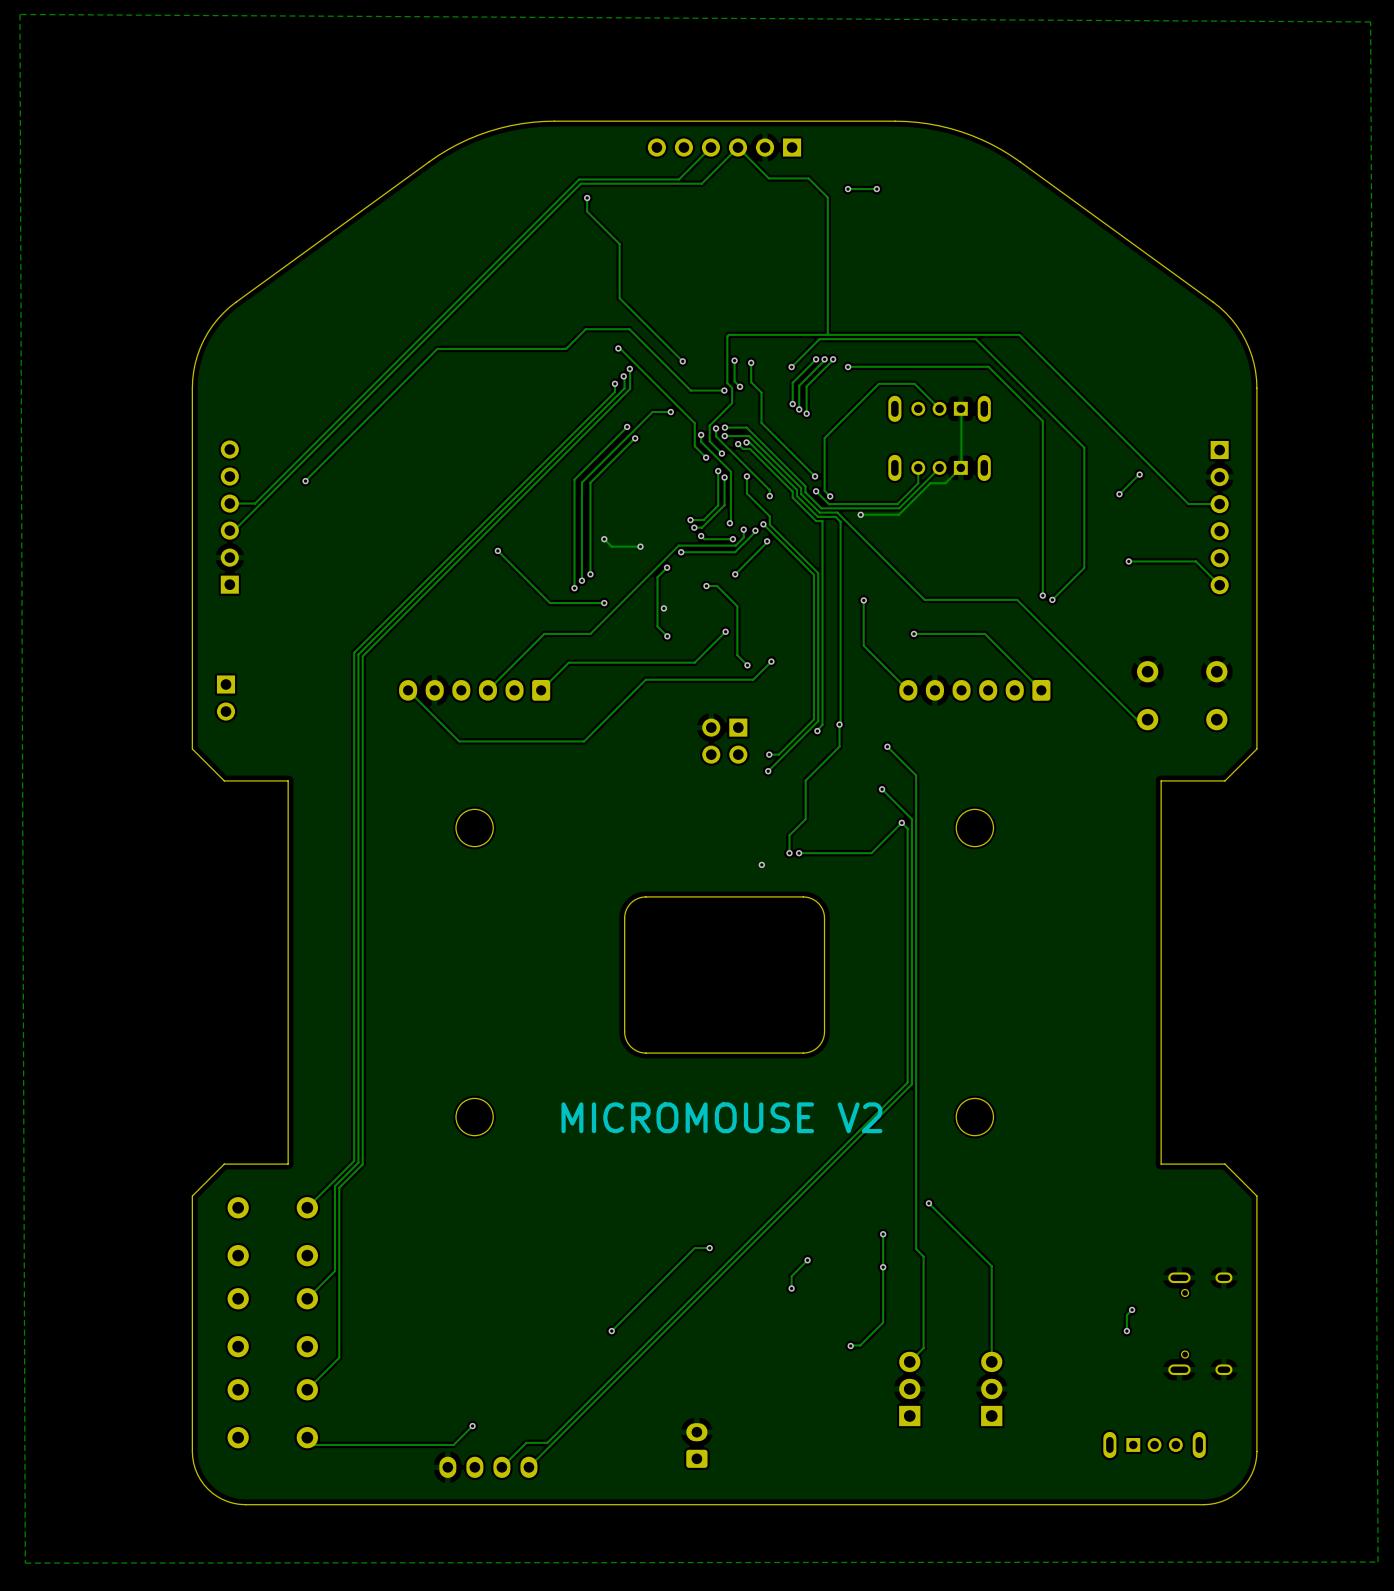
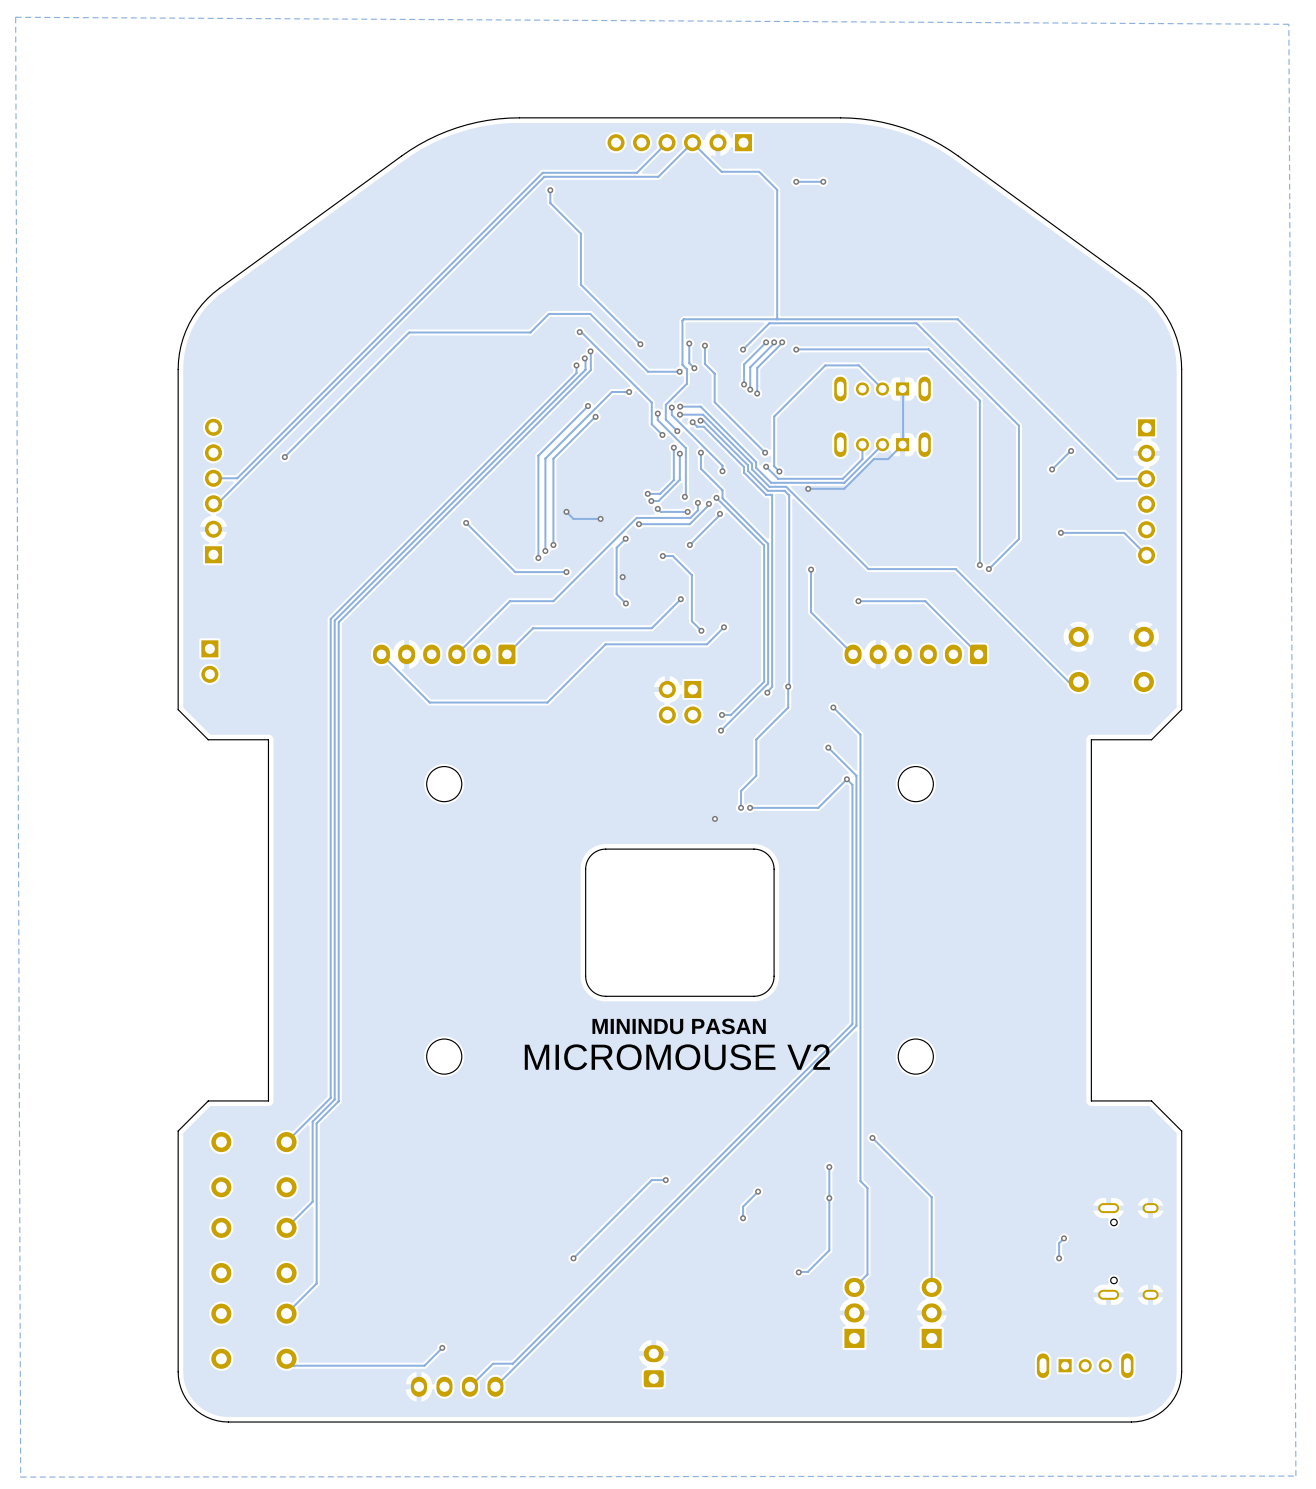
text: none -> MININDU PASAN (679, 1026)

